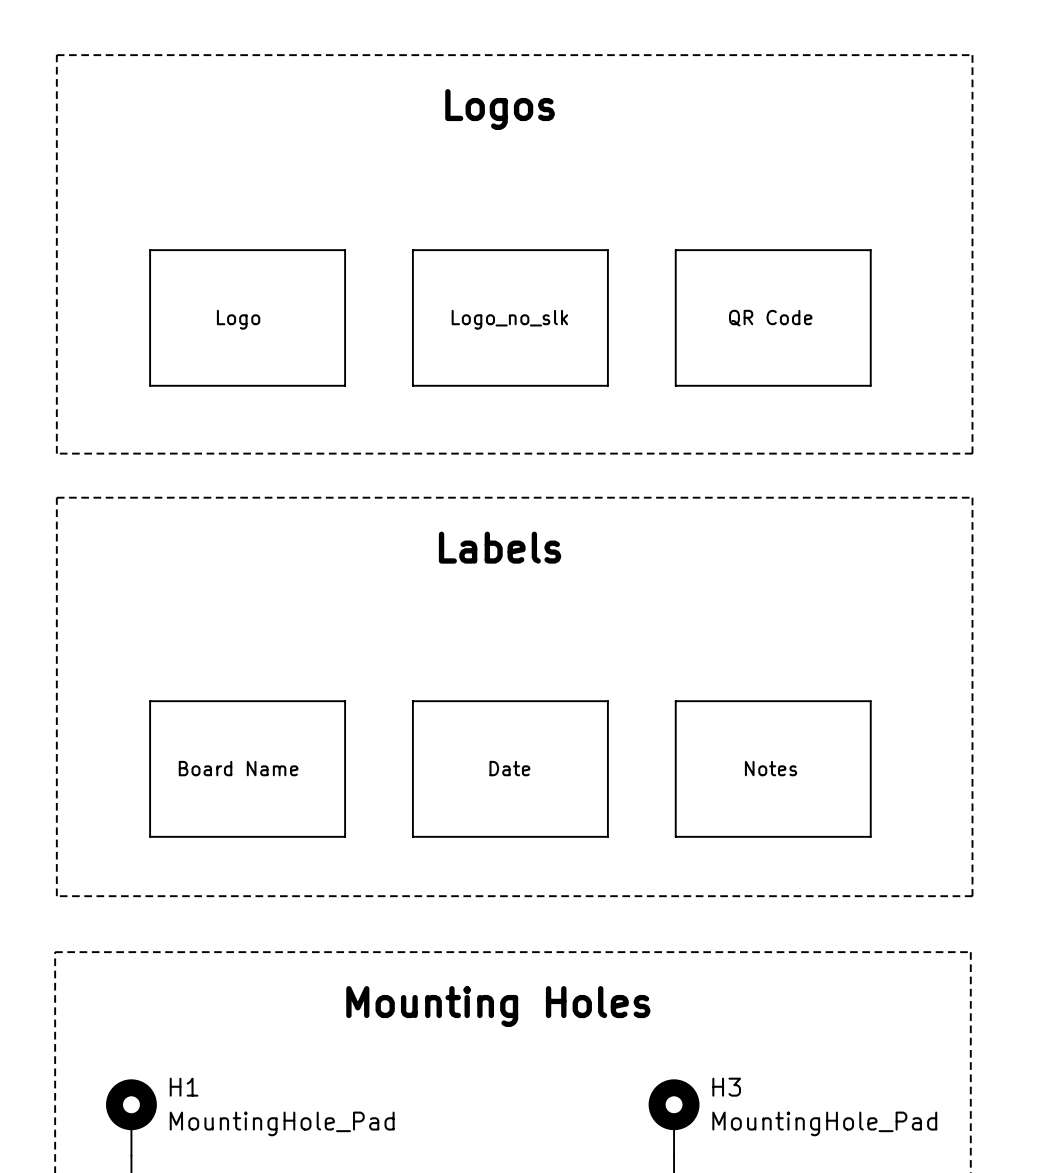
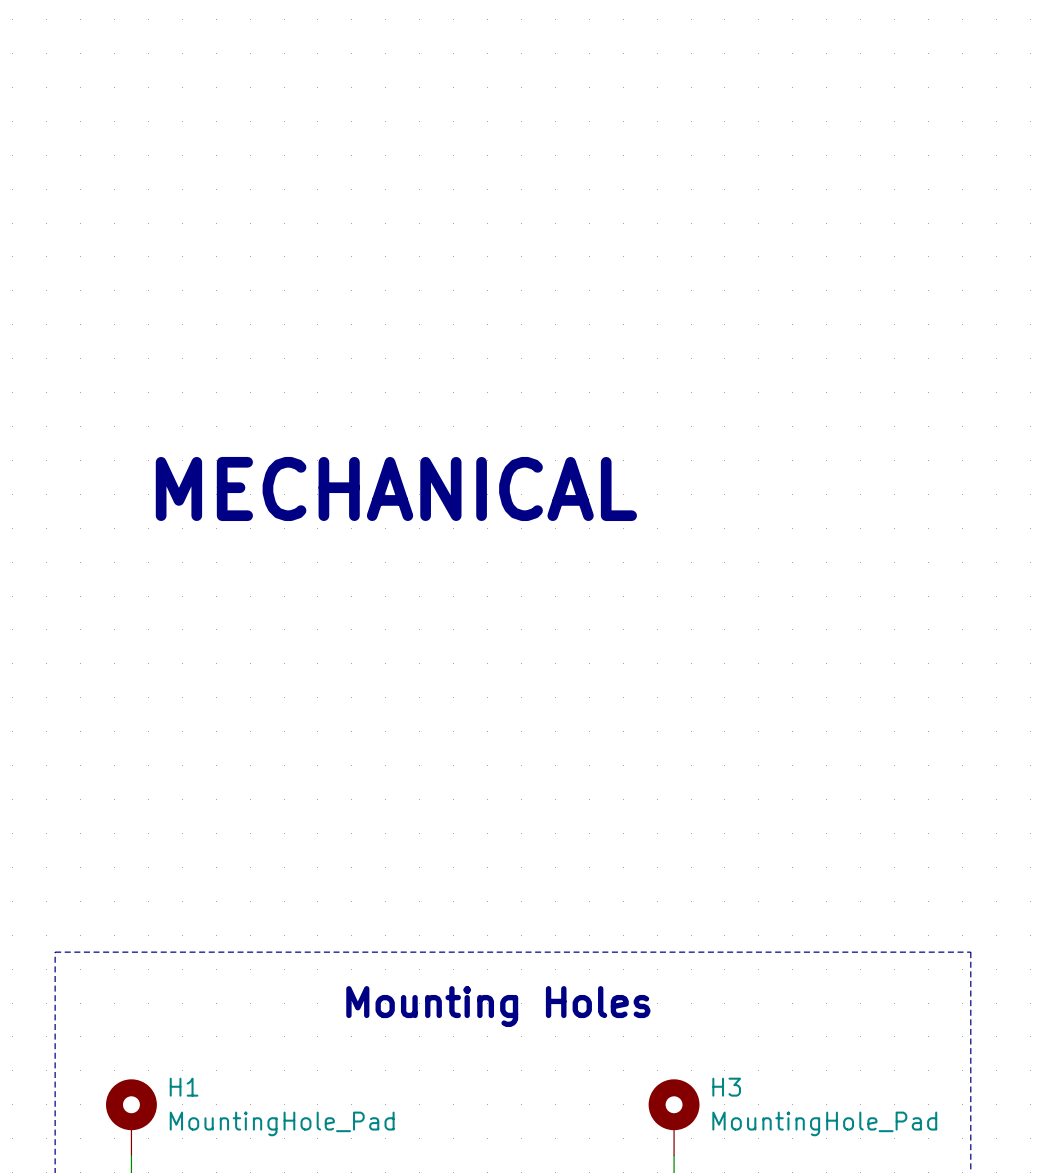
line: (56, 55) (56, 453) (972, 453) (972, 55) (56, 55) -> none
text: Logos (500, 109) -> none
line: (150, 250) (345, 250) (345, 385) (150, 385) (150, 250) -> none
line: (412, 250) (607, 250) (607, 385) (412, 385) (412, 250) -> none
line: (675, 250) (870, 250) (870, 385) (675, 385) (675, 250) -> none
text: QR Code (770, 318) -> none
text: Logo (238, 319) -> none
text: Logo_no_slk (509, 319) -> none
text: none -> MECHANICAL (396, 488)
line: (56, 497) (972, 497) (972, 896) (56, 896) (56, 497) -> none
text: Labels (500, 547) -> none
line: (150, 701) (150, 836) (345, 836) (345, 701) (150, 701) -> none
line: (412, 701) (607, 701) (607, 836) (412, 836) (412, 701) -> none
line: (675, 701) (870, 701) (870, 836) (675, 836) (675, 701) -> none
text: Board Name (238, 768) -> none
text: Date (509, 768) -> none
text: Notes (771, 768) -> none

